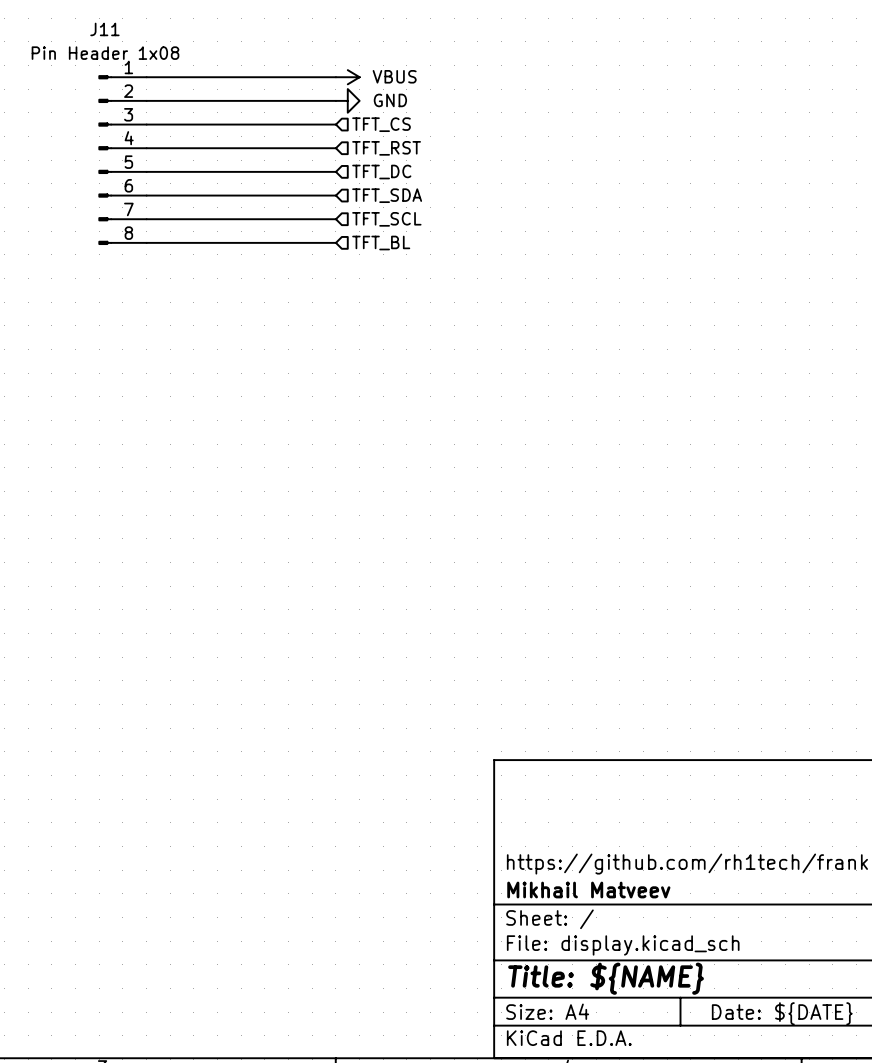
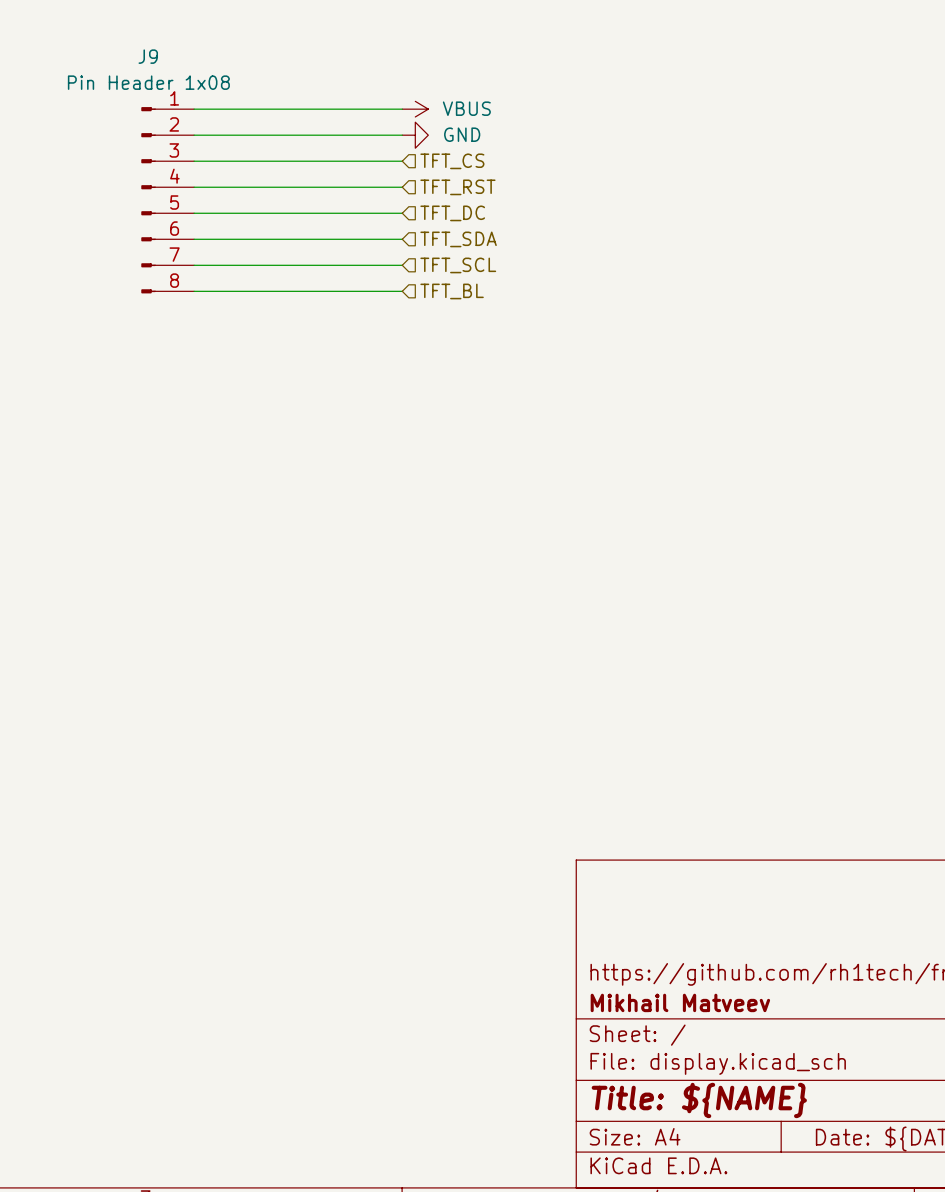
J11 name: J11 (104, 29) -> J9 (148, 56)

